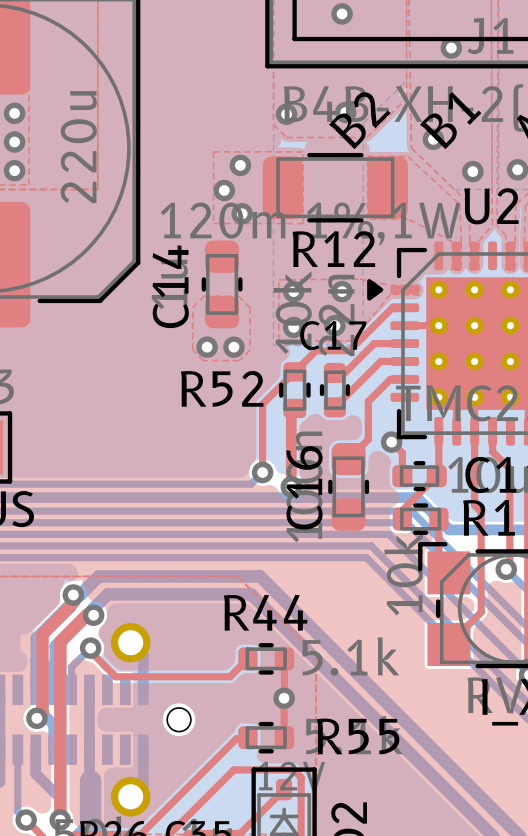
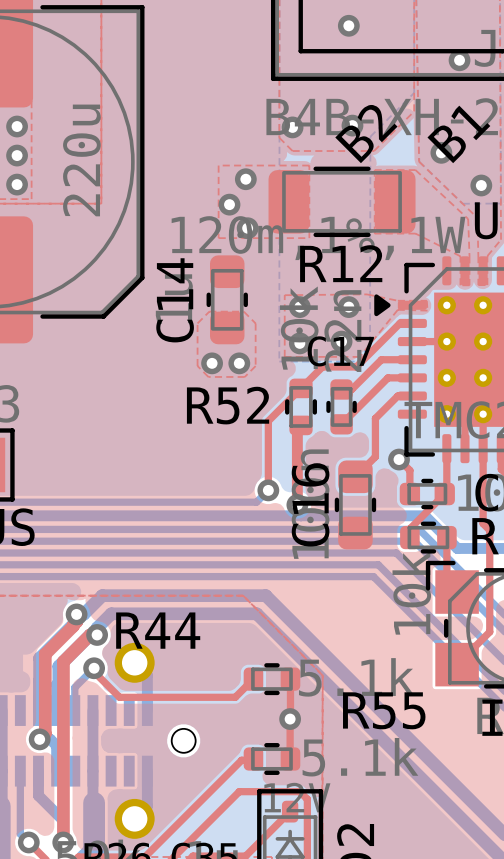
R44 name position: R44 (265, 612) -> R44 (158, 630)
R55 name position: R55 (358, 736) -> R55 (384, 710)

